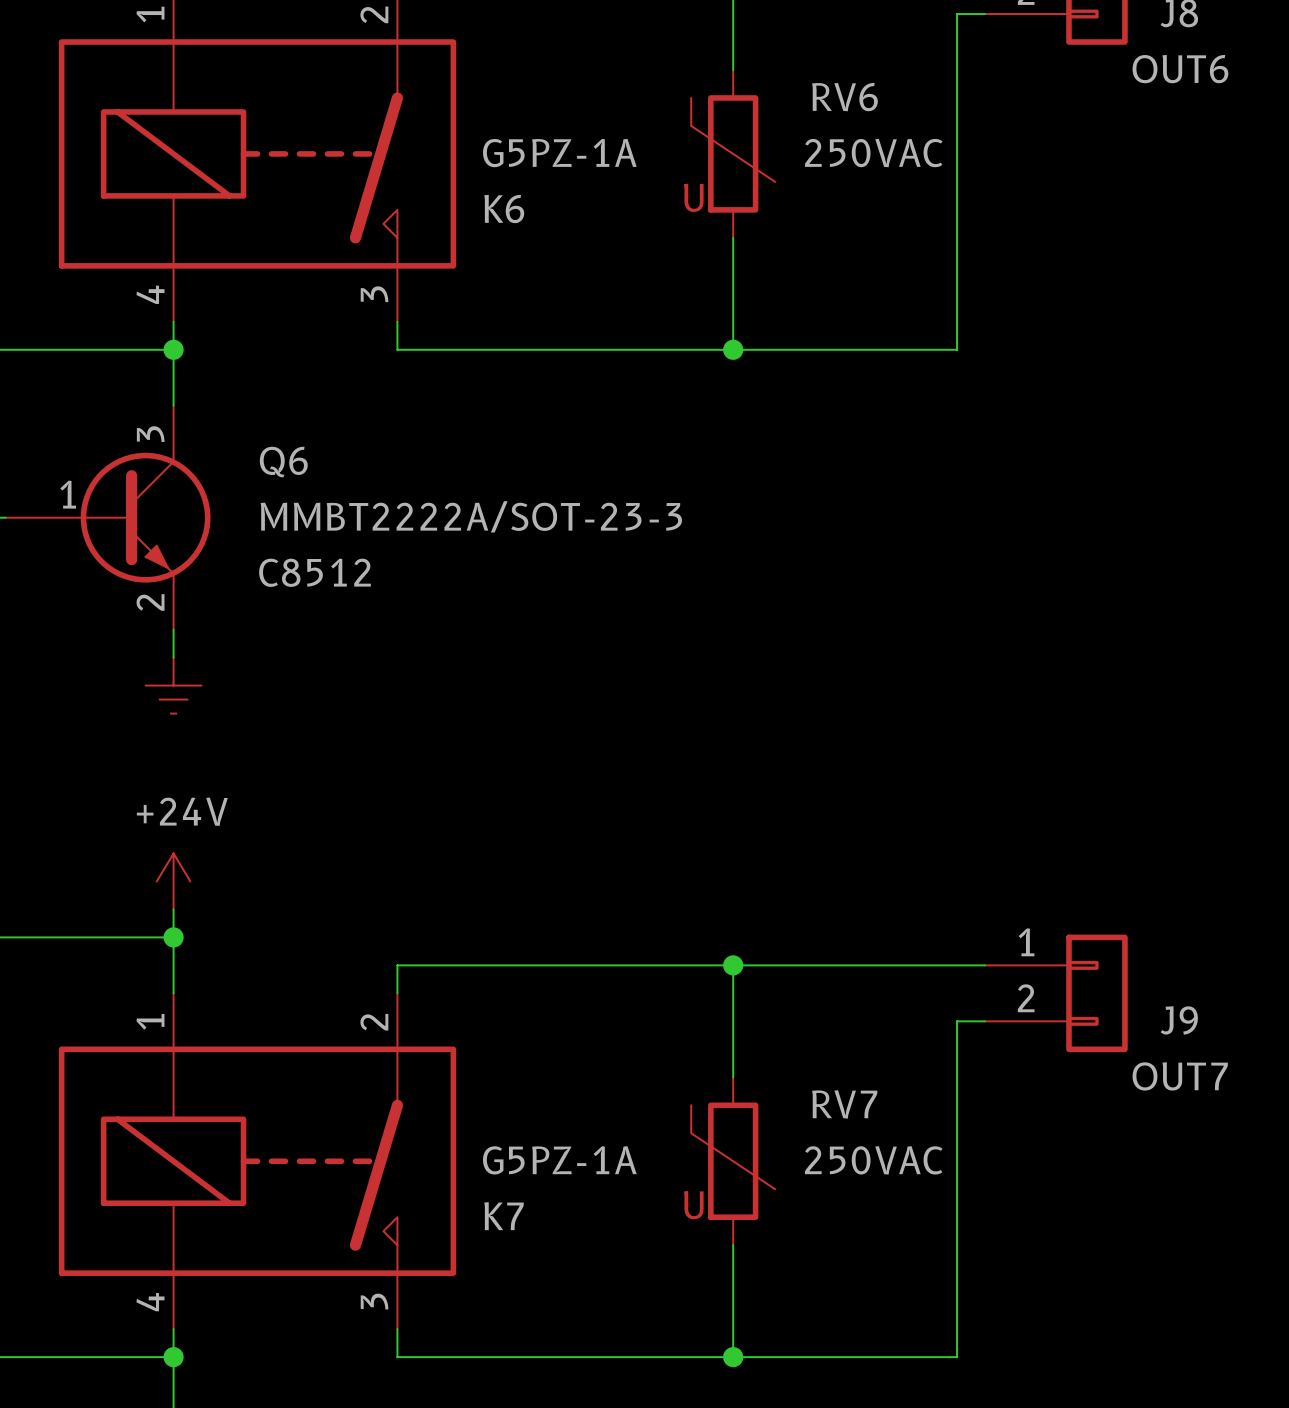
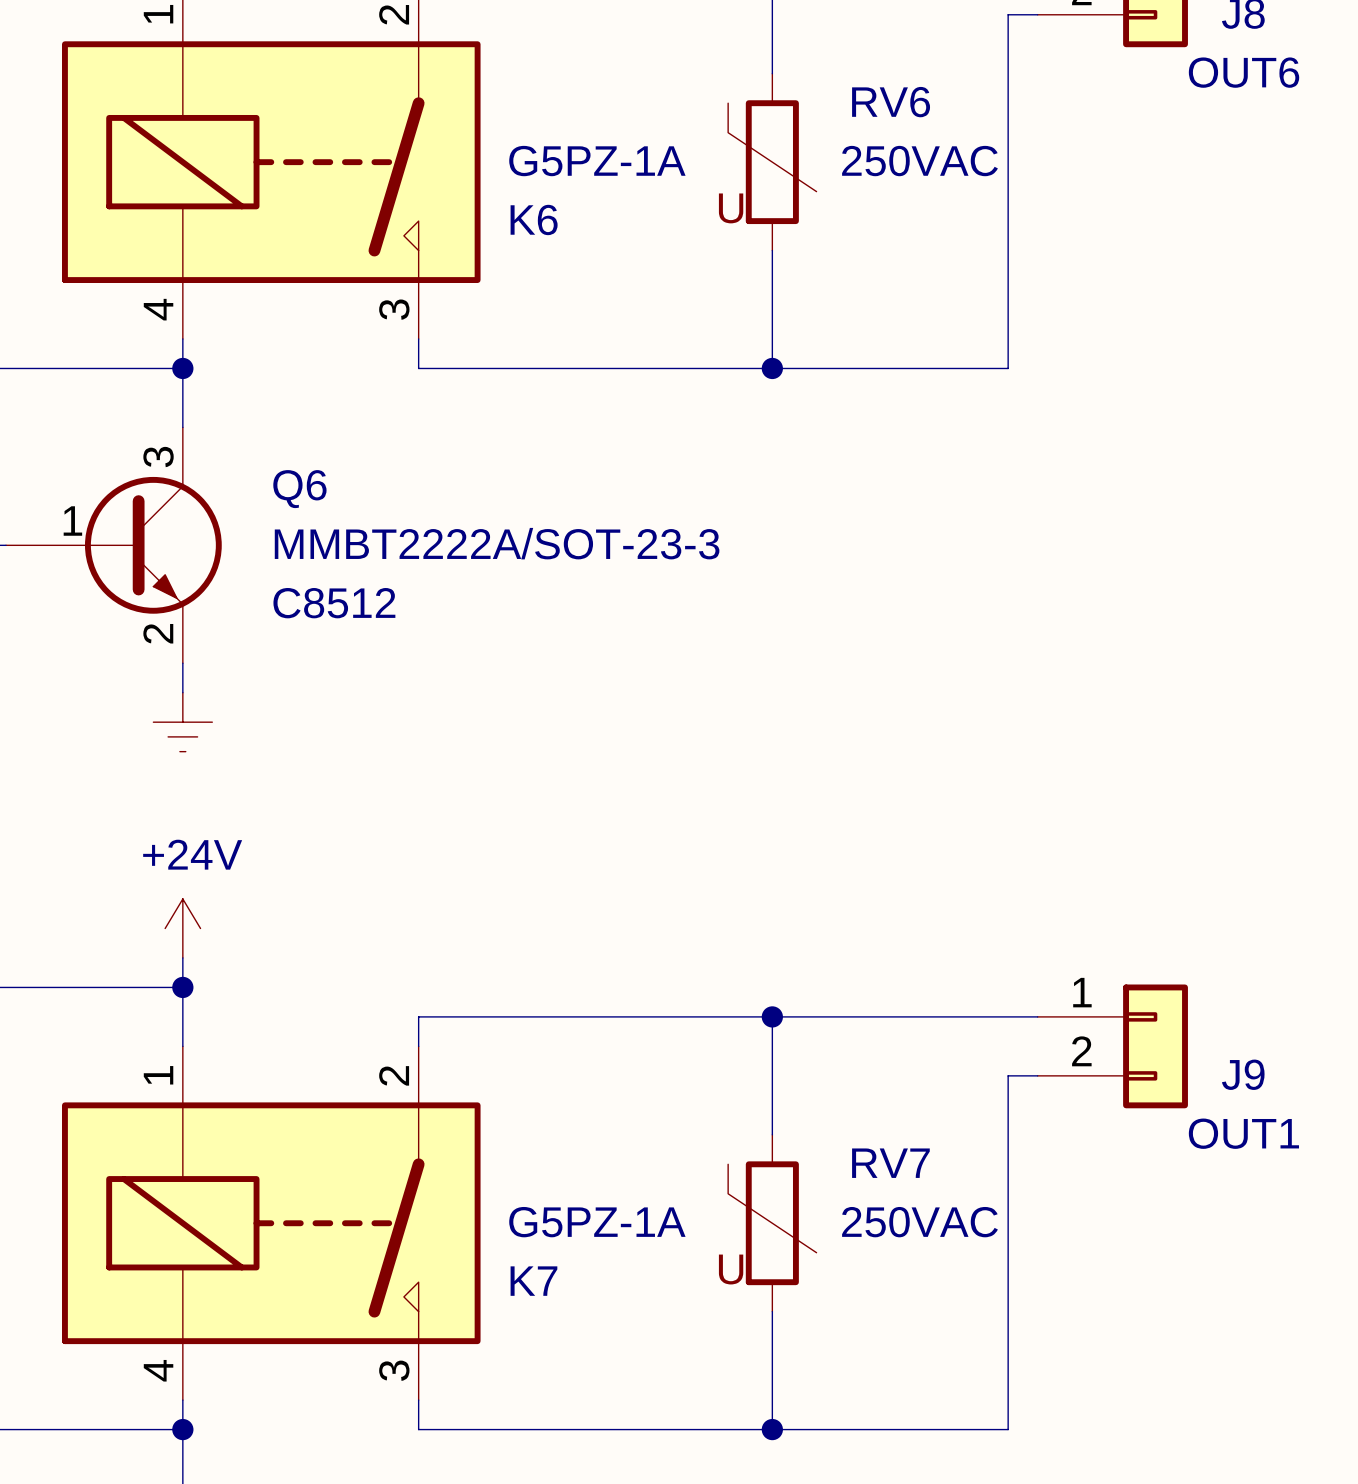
J9 value: OUT7 (1180, 1076) -> OUT1 (1243, 1133)

